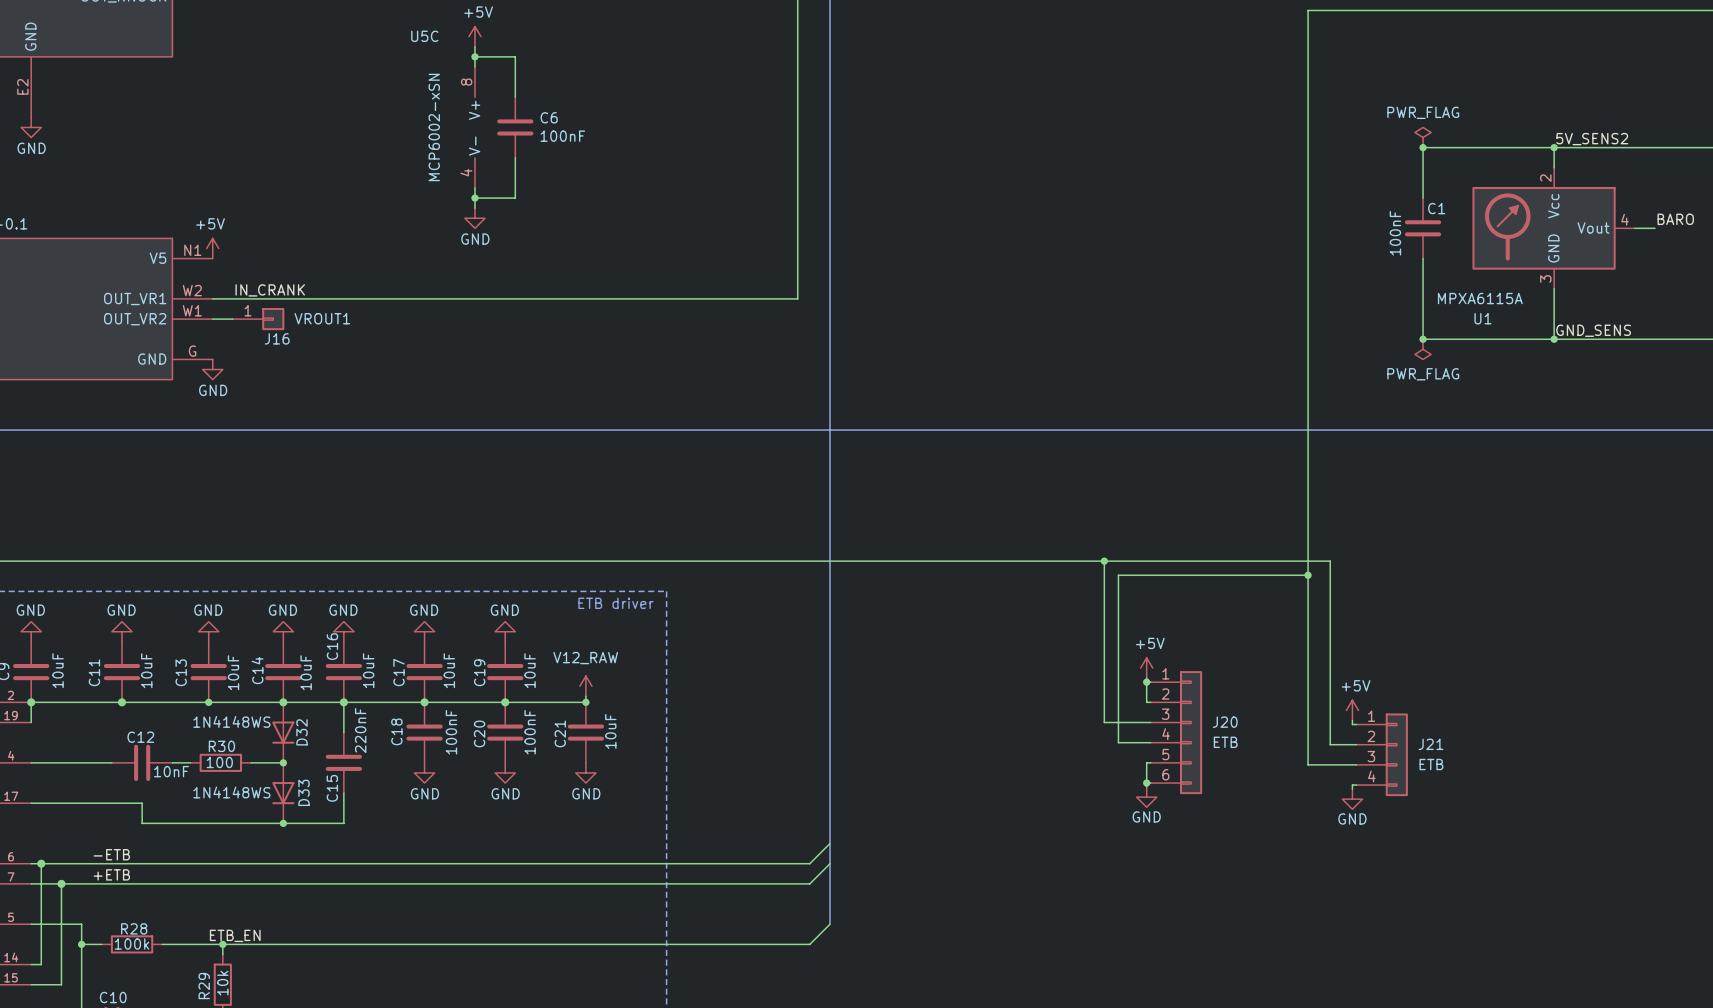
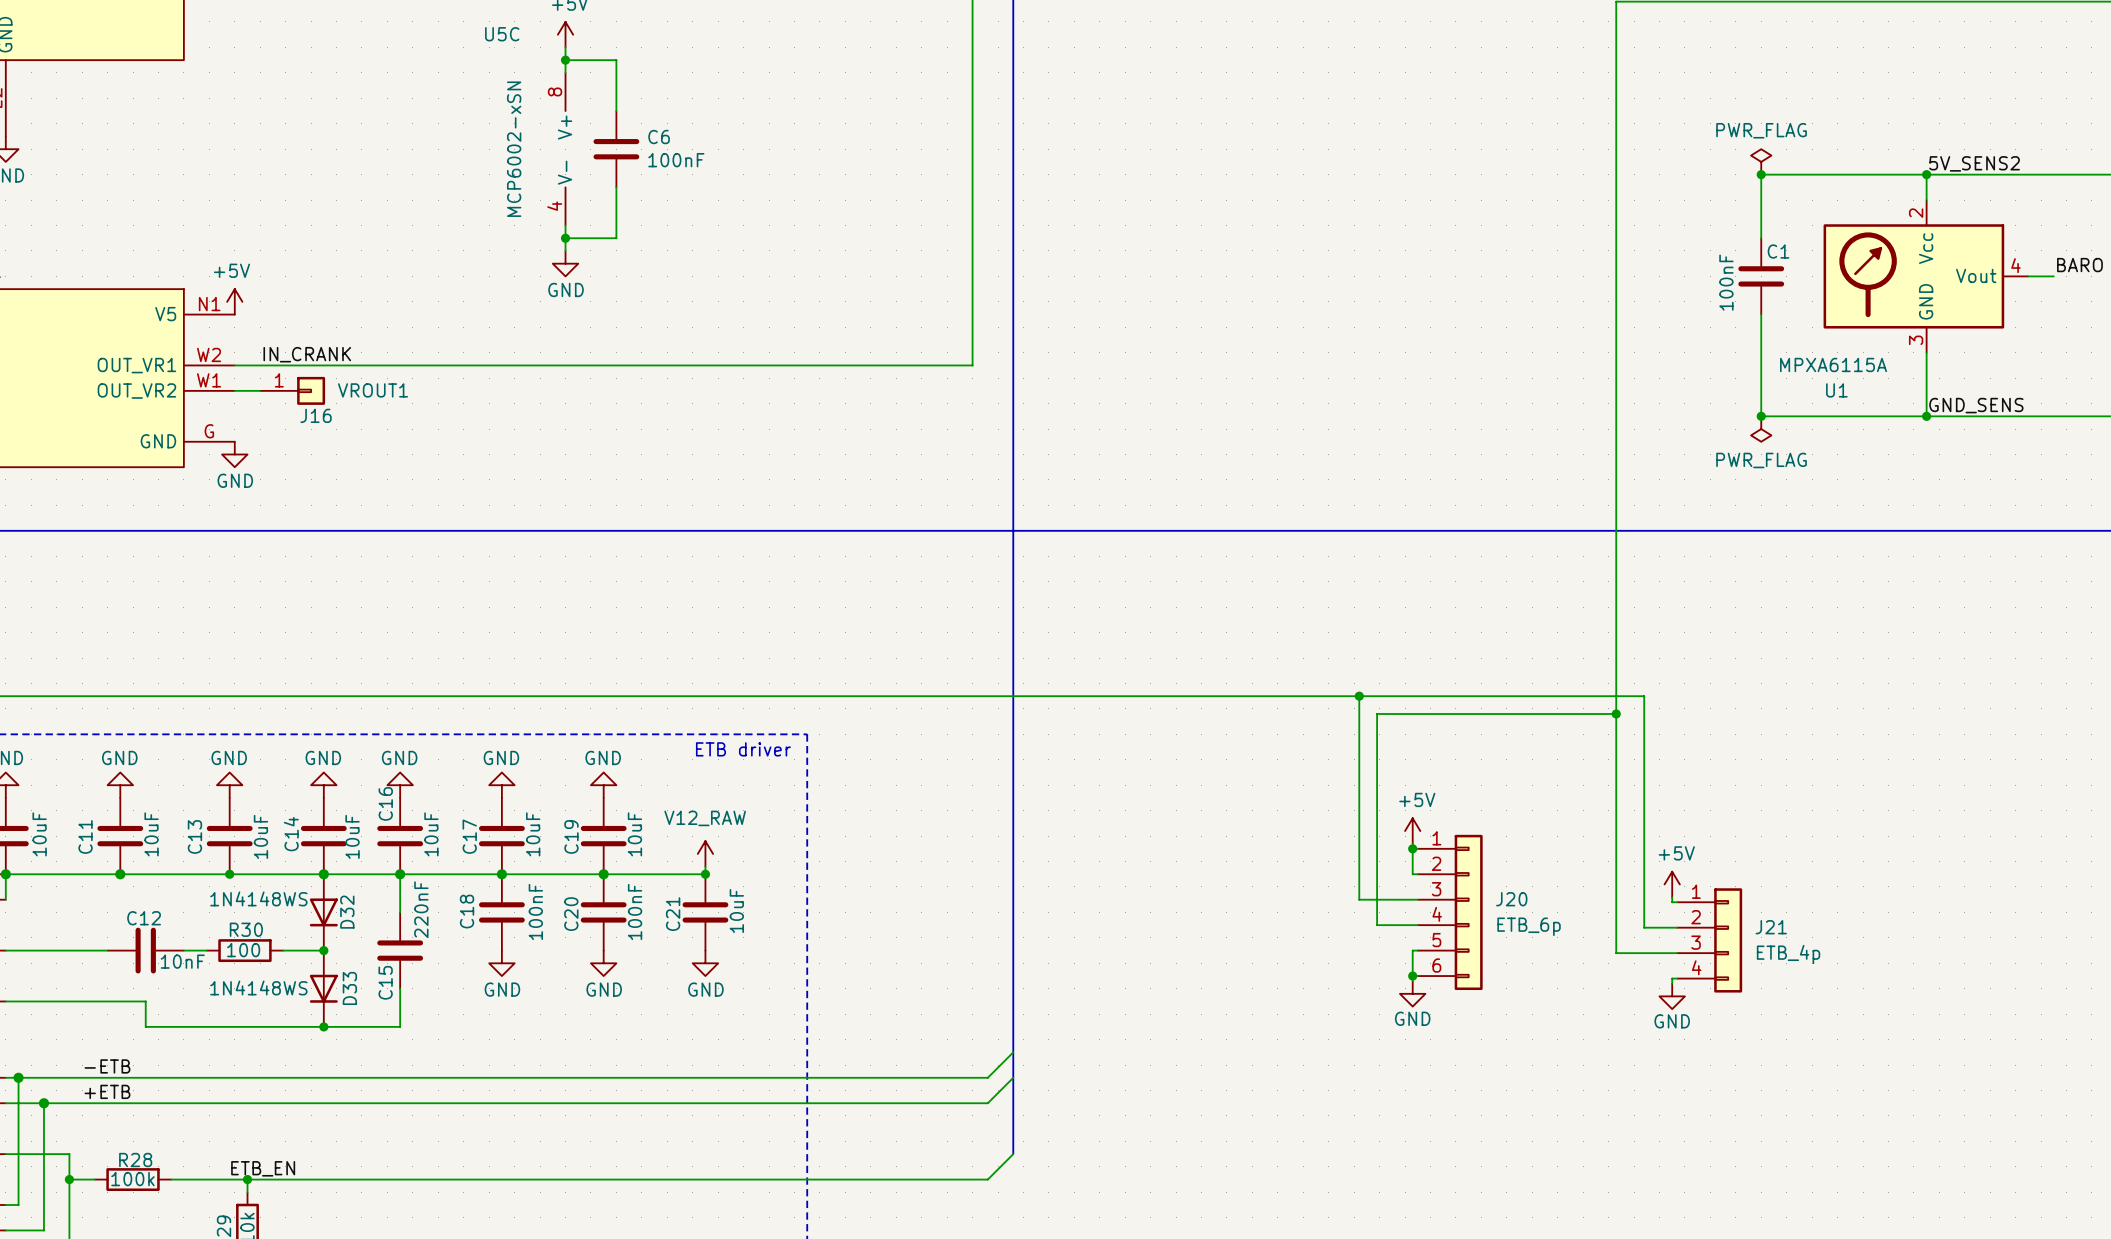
J20 value: ETB (1225, 742) -> ETB_6p (1529, 926)
J21 value: ETB (1431, 764) -> ETB_4p (1788, 954)

